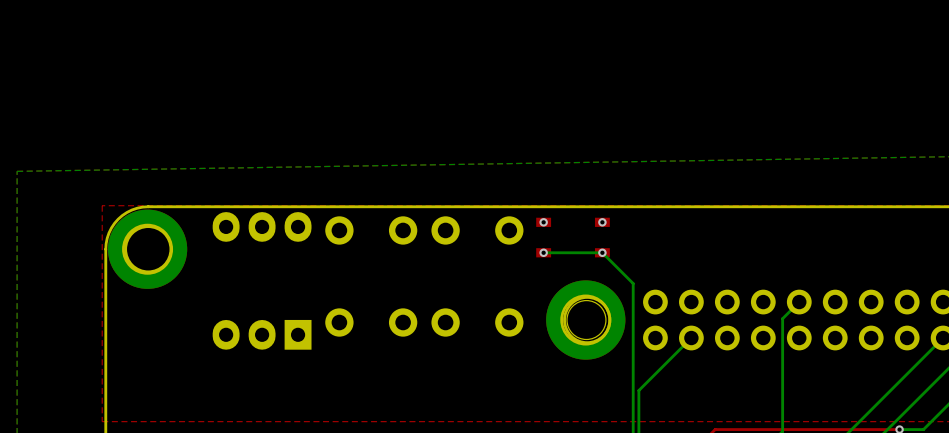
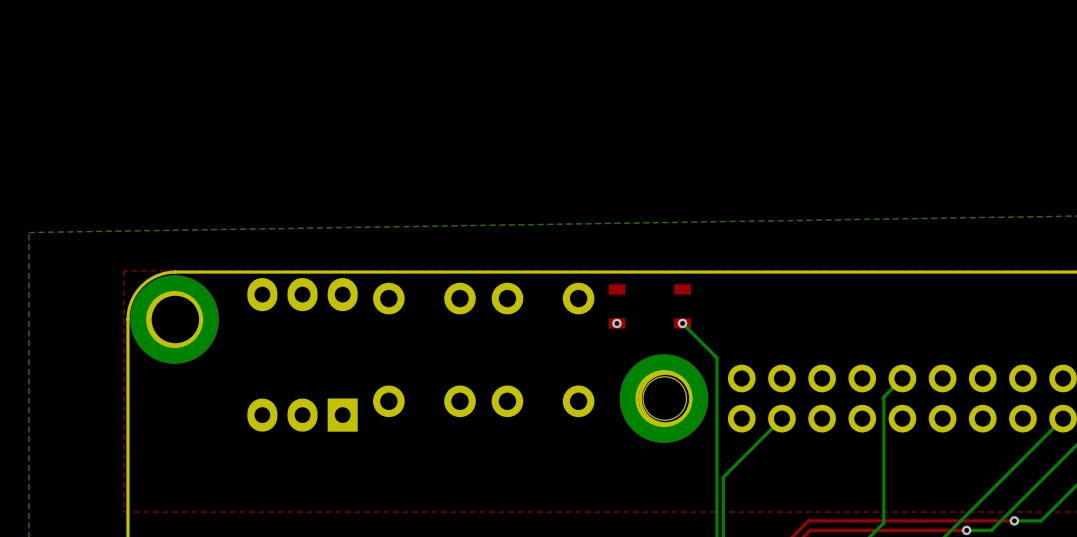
via: (543, 222) -> none
via: (602, 222) -> none
bottom track: (602, 252) (543, 252) -> none

